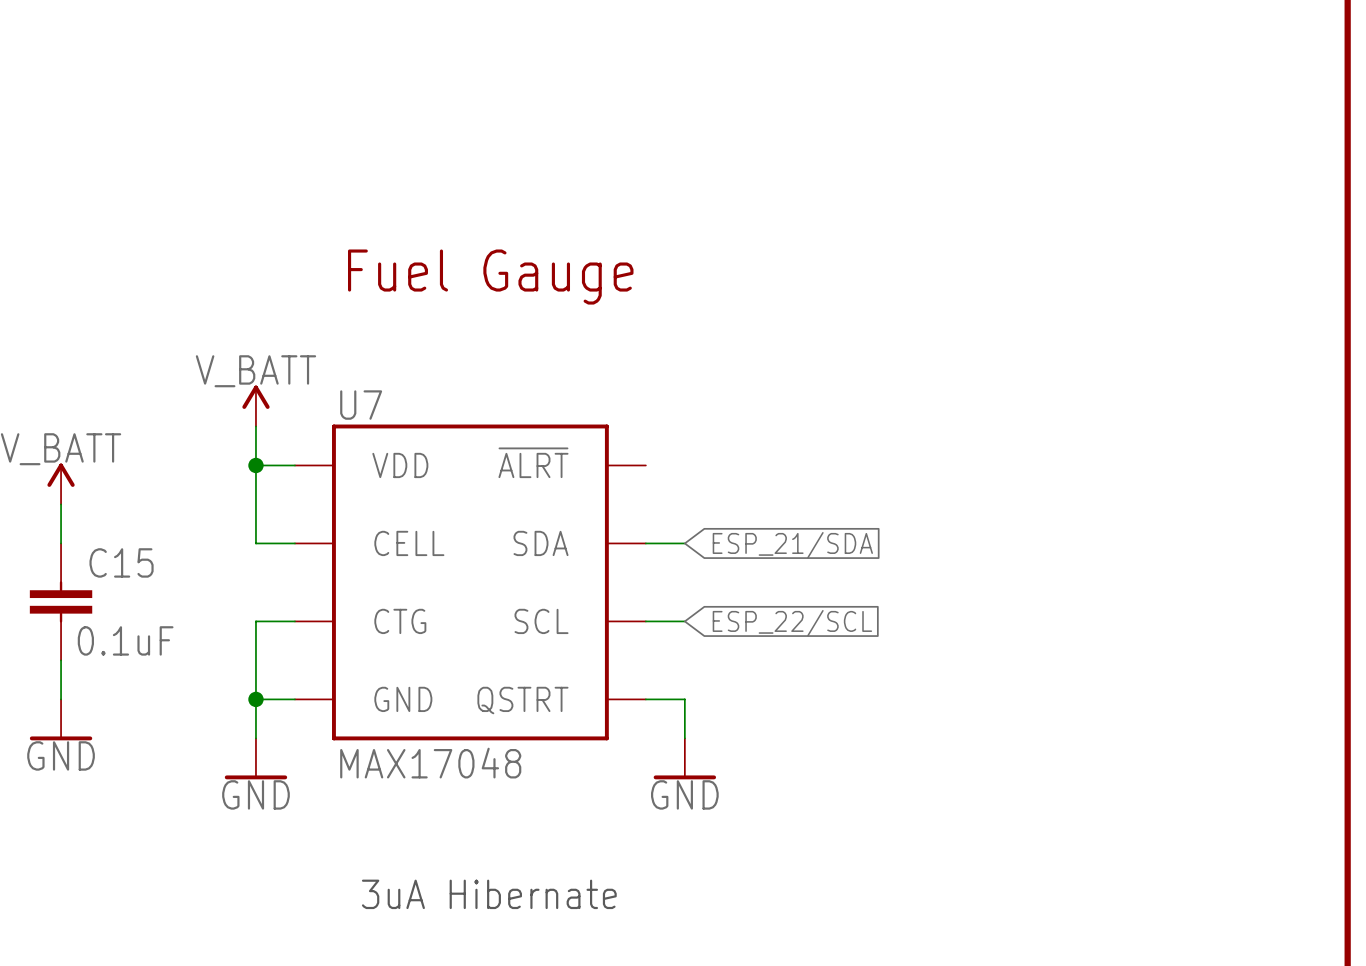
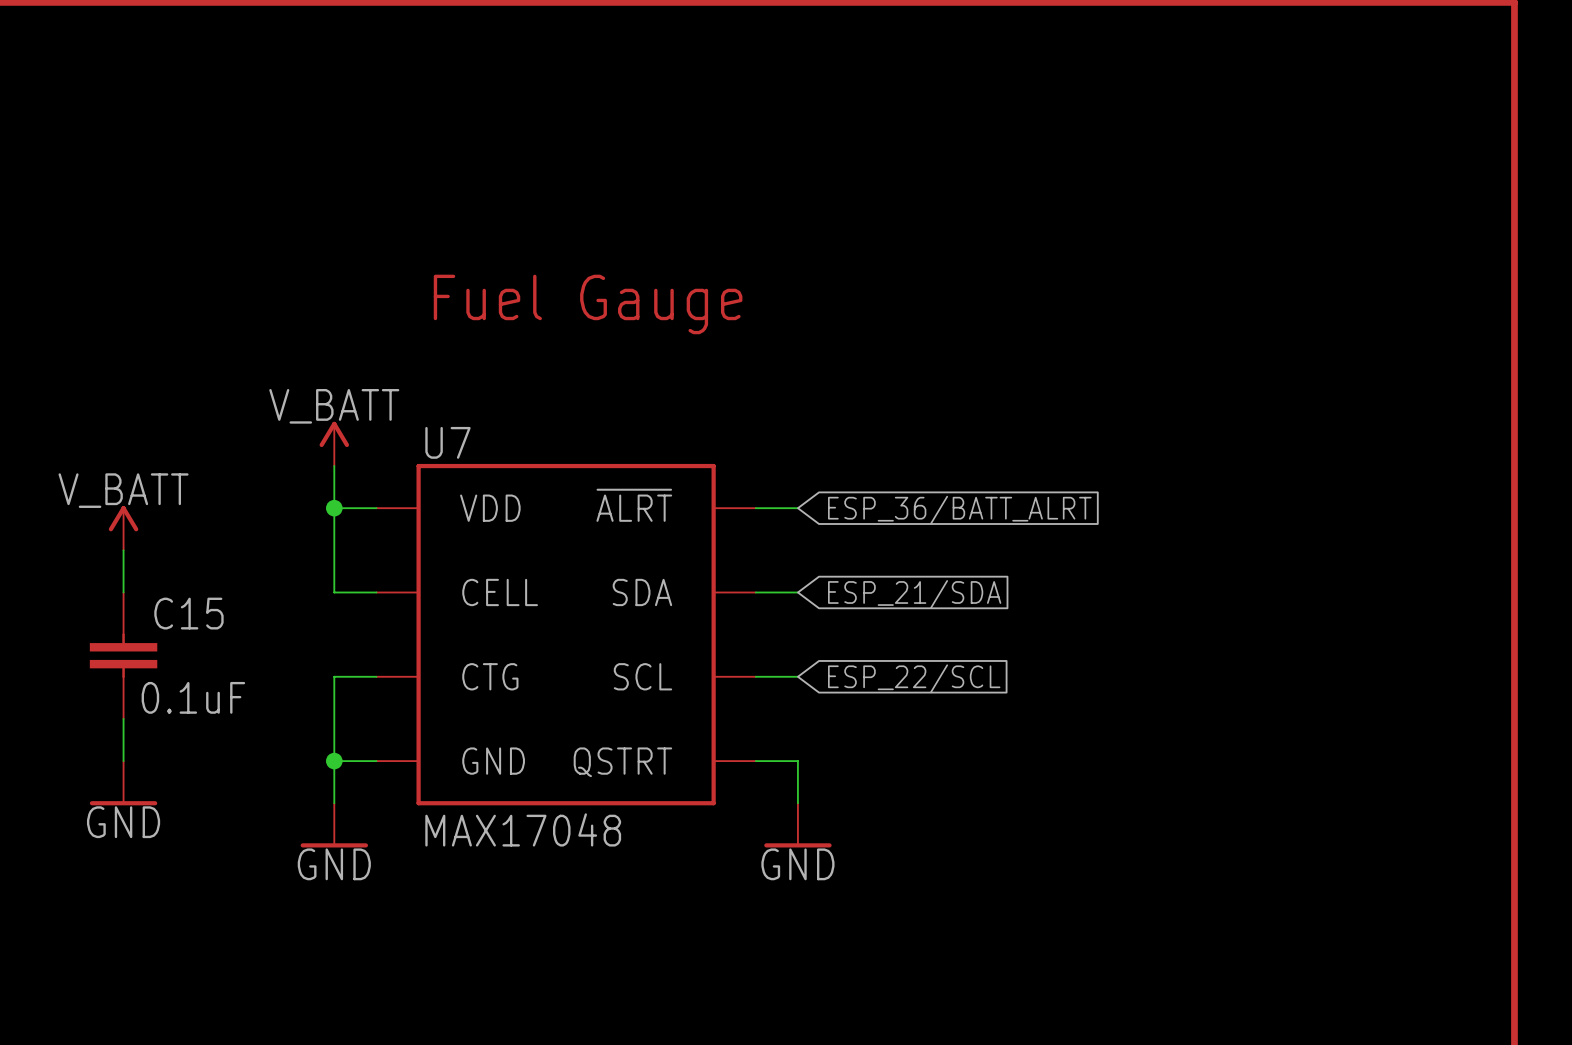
wire: none -> (755, 508) (797, 508)
global label: none -> ESP_36/BATT_ALRT (959, 510)
text: 3uA Hibernate (489, 894) -> none

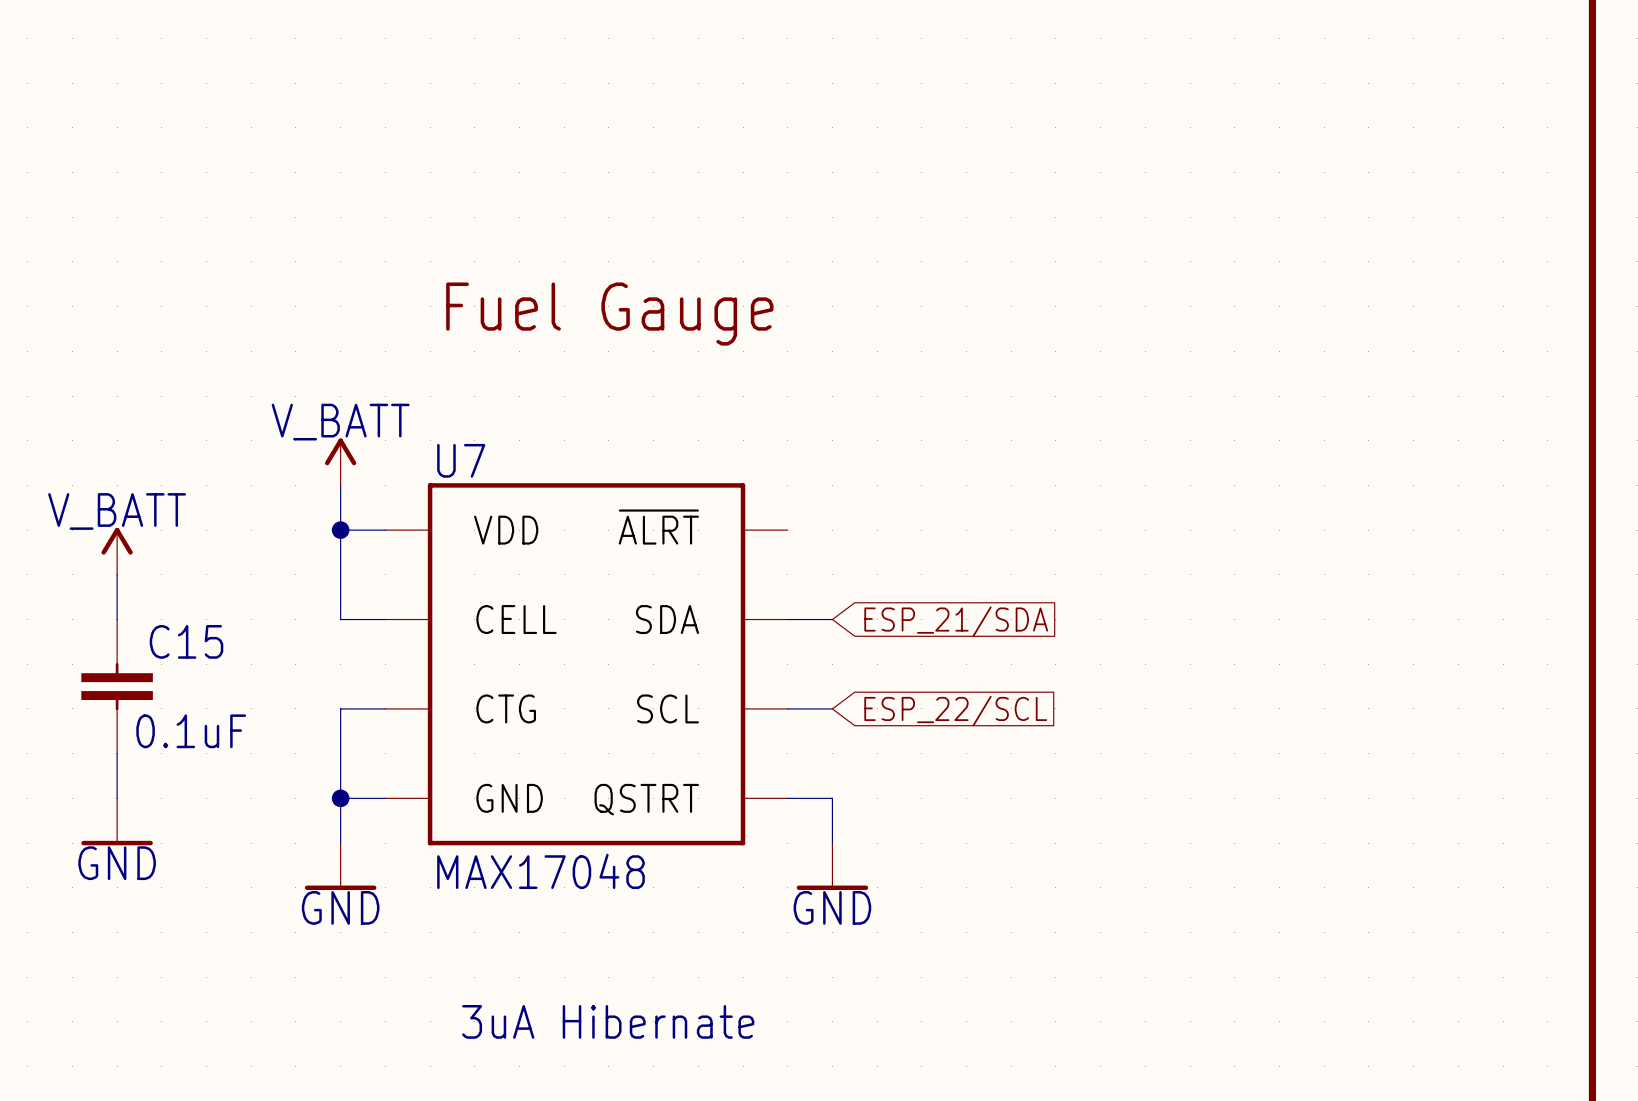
wire: (755, 508) (797, 508) -> none
global label: ESP_36/BATT_ALRT (959, 510) -> none
text: none -> 3uA Hibernate (608, 1021)

